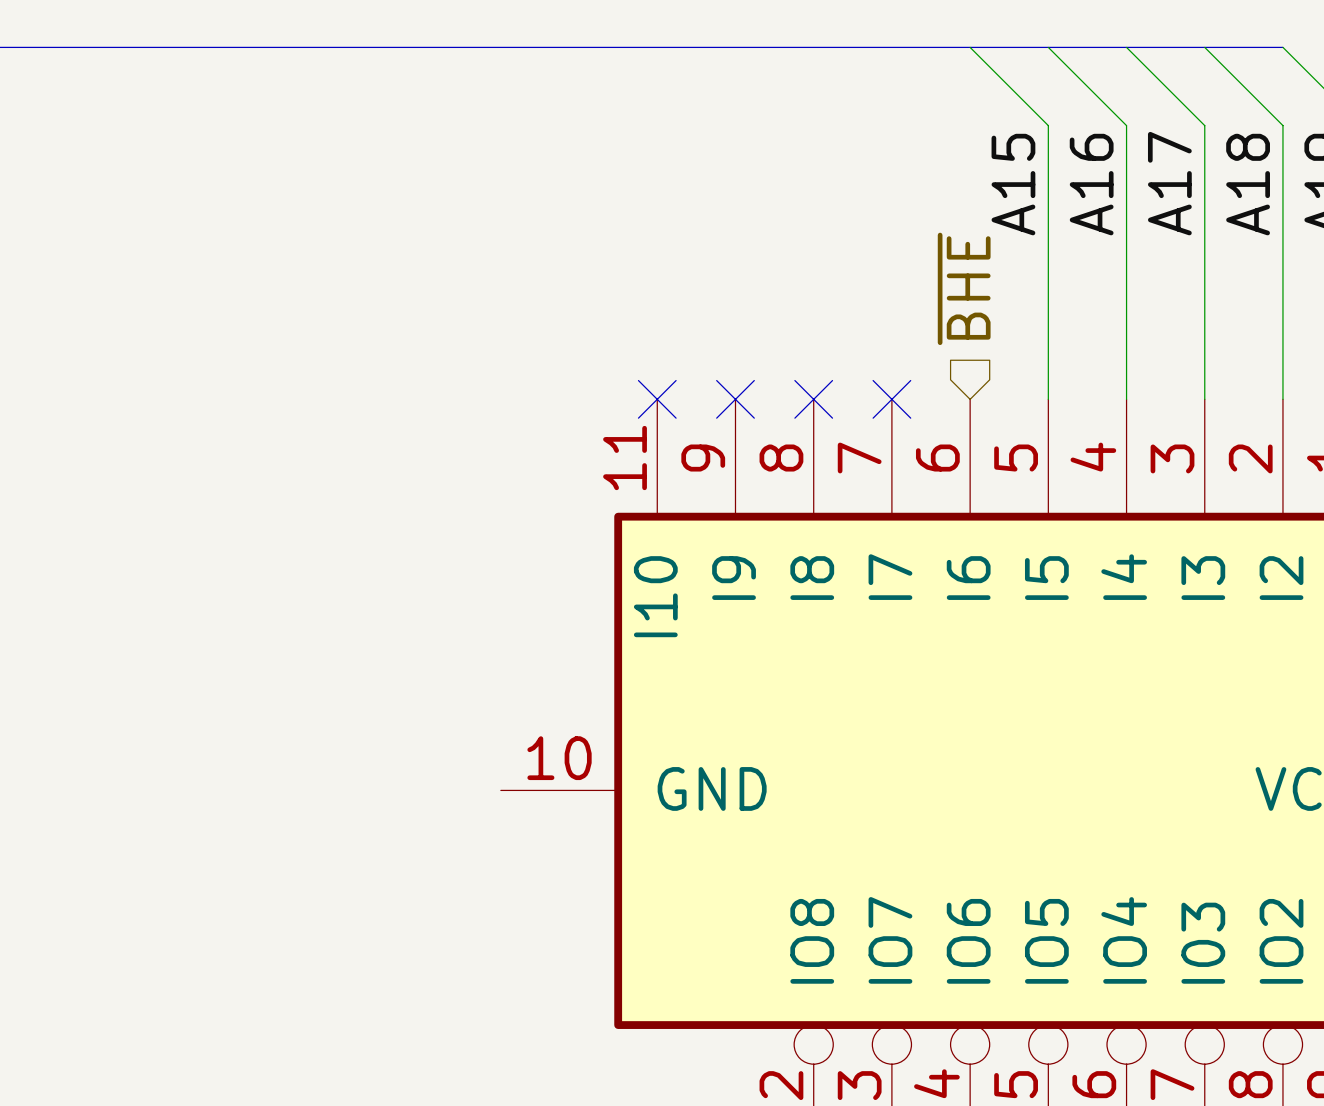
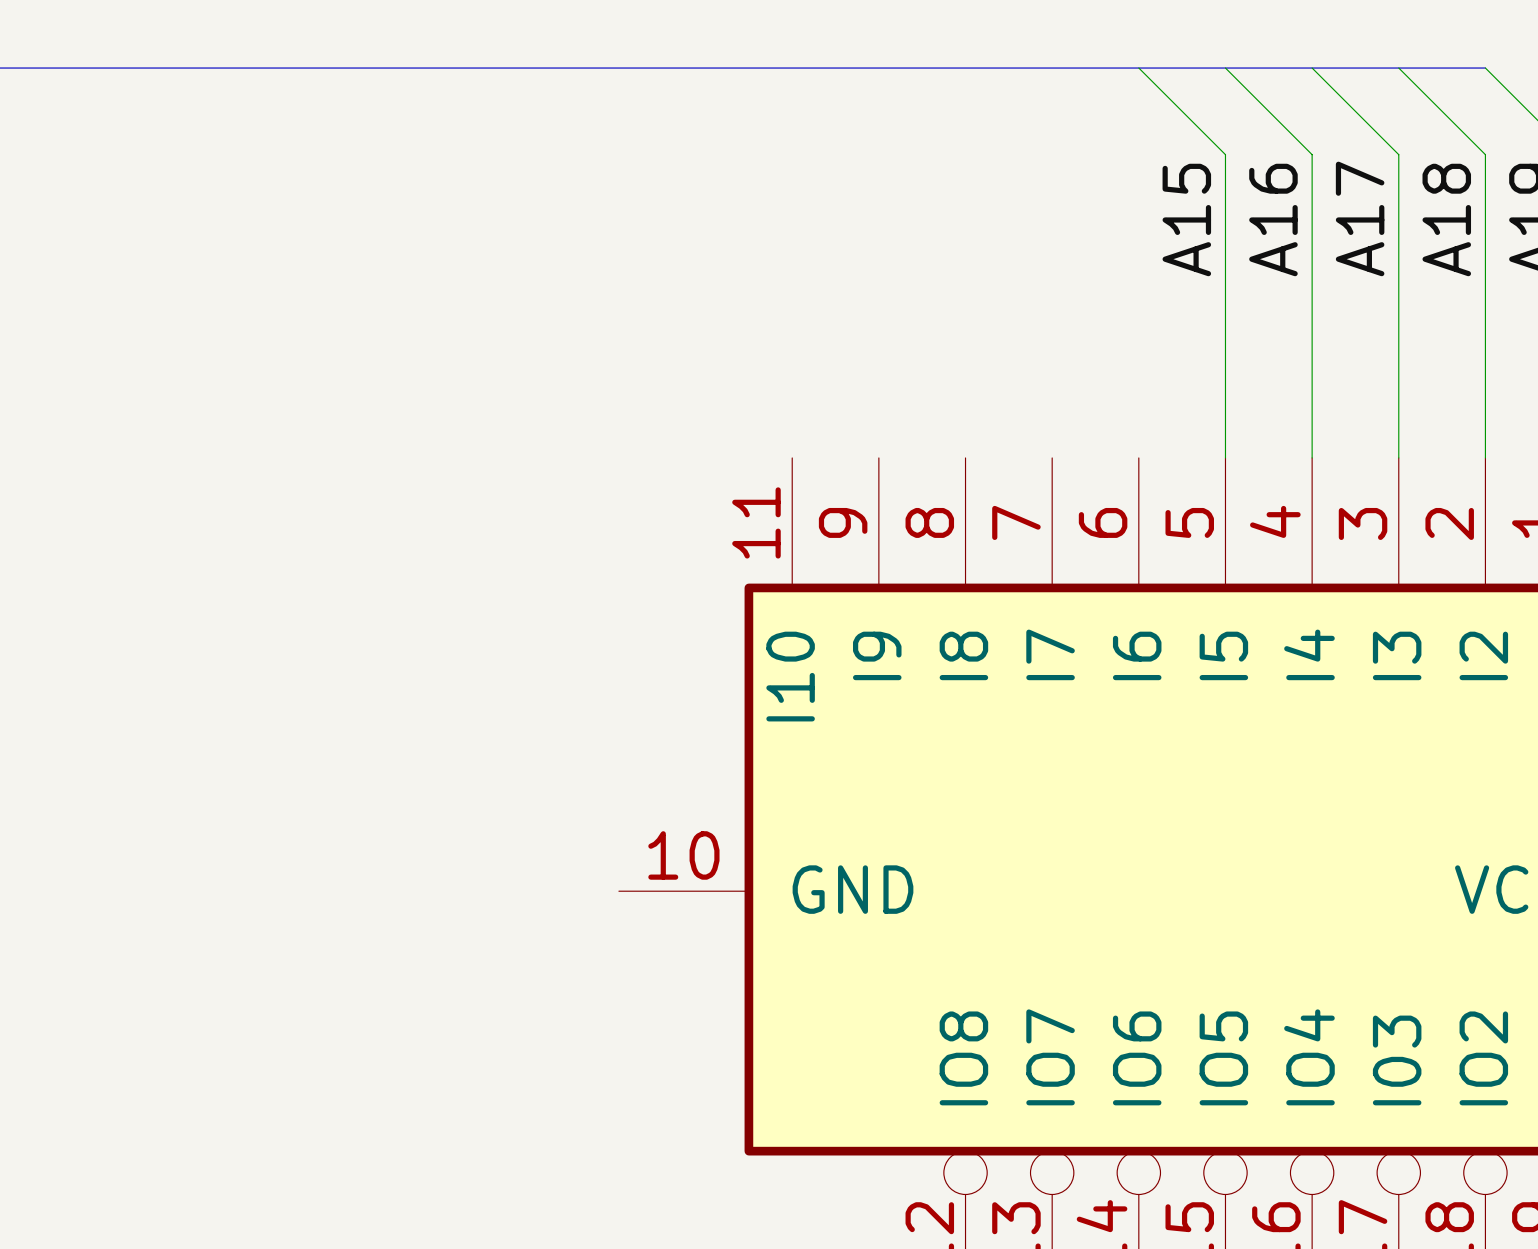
hierarchical label: ~{BHE} (964, 288) -> none
no-connect mark: (657, 399) -> none
no-connect mark: (735, 399) -> none
no-connect mark: (813, 399) -> none
no-connect mark: (891, 399) -> none

